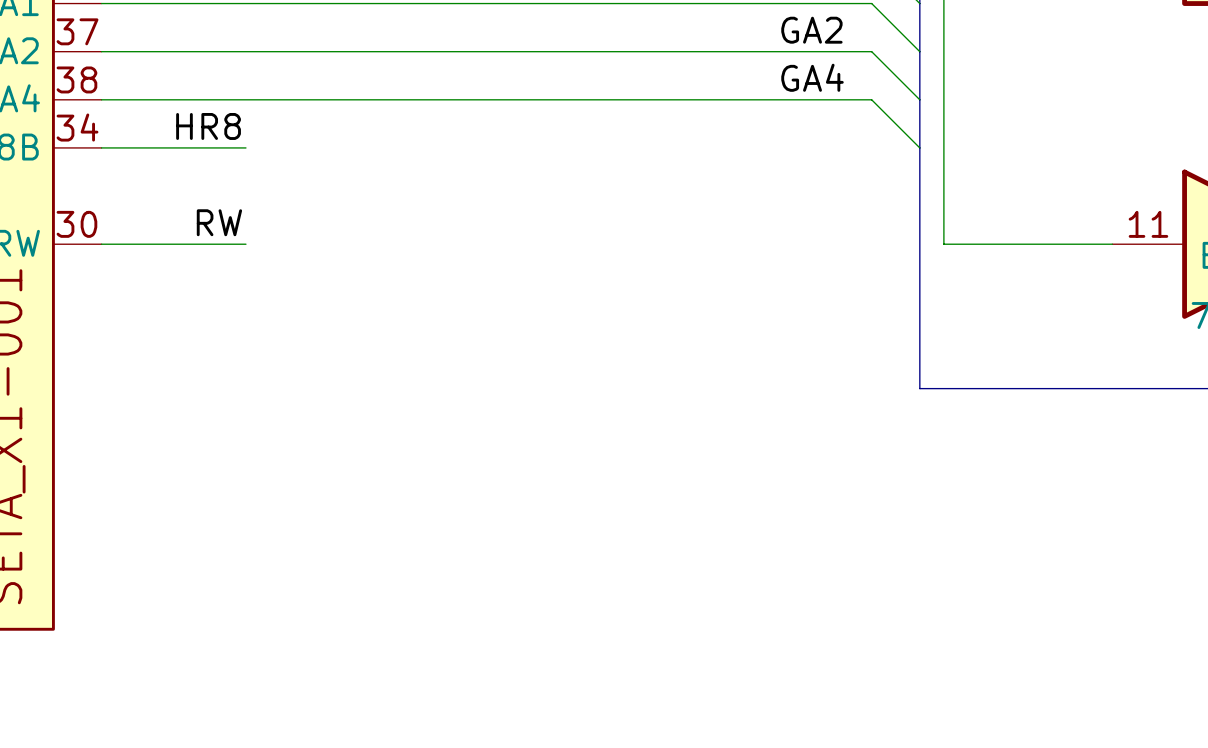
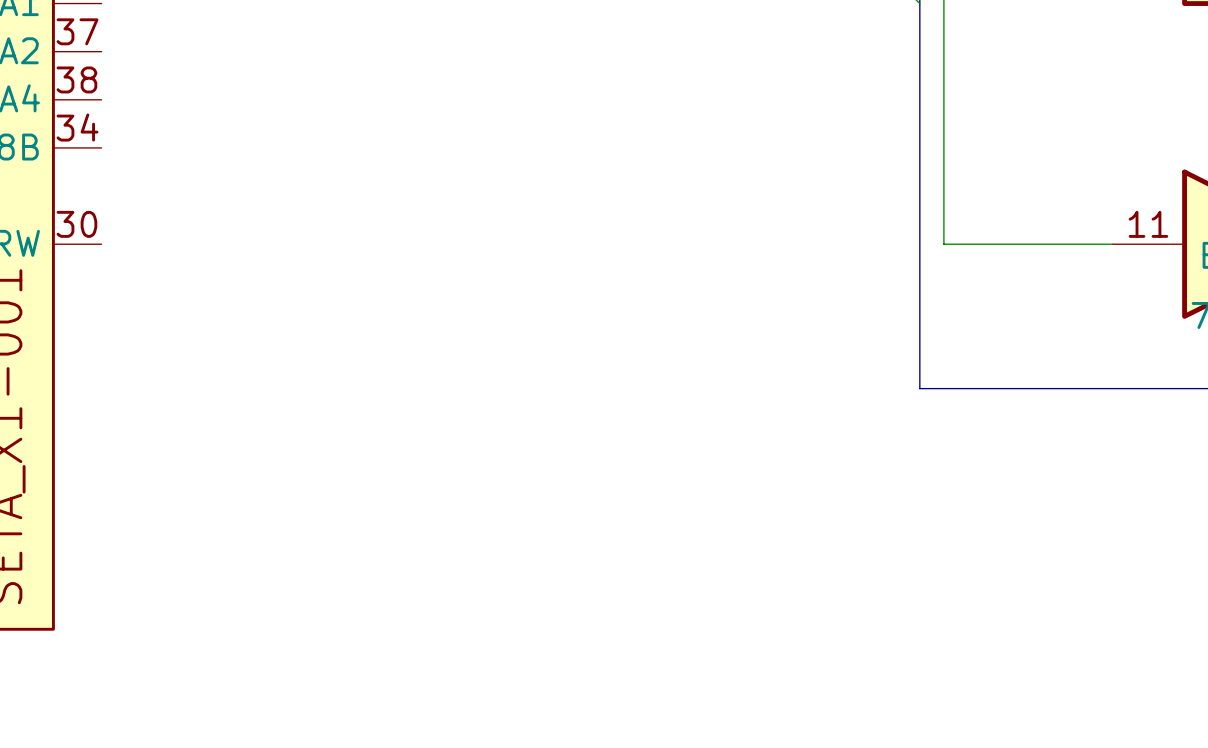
wire: (101, 3) (871, 3) (919, 51) -> none
label: GA2 (811, 30) -> none
wire: (101, 51) (871, 51) (919, 99) -> none
label: GA4 (812, 77) -> none
wire: (101, 99) (871, 99) (919, 147) -> none
label: HR8 (208, 126) -> none
wire: (101, 147) (245, 147) -> none
label: RW (219, 222) -> none
wire: (101, 244) (245, 244) -> none

